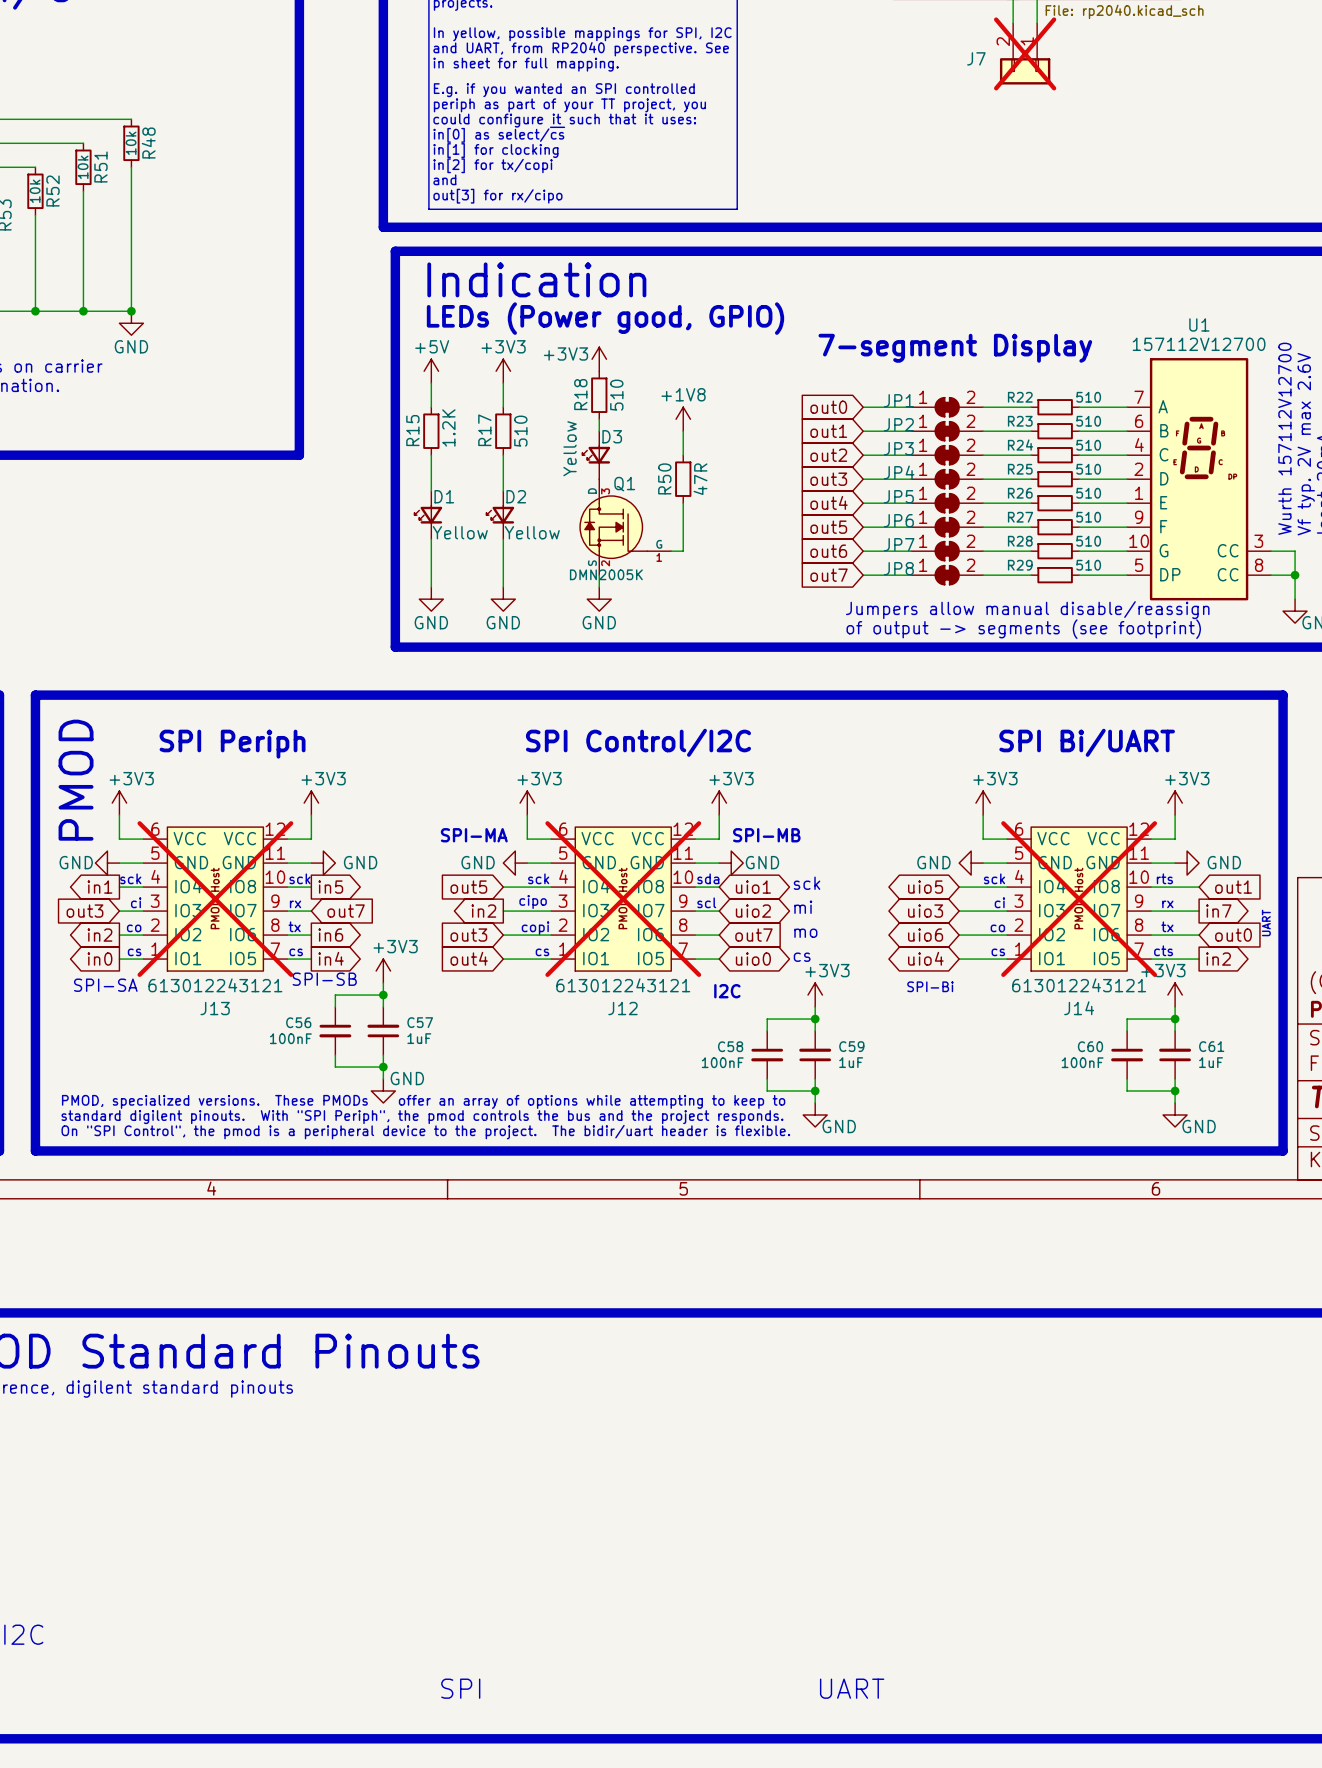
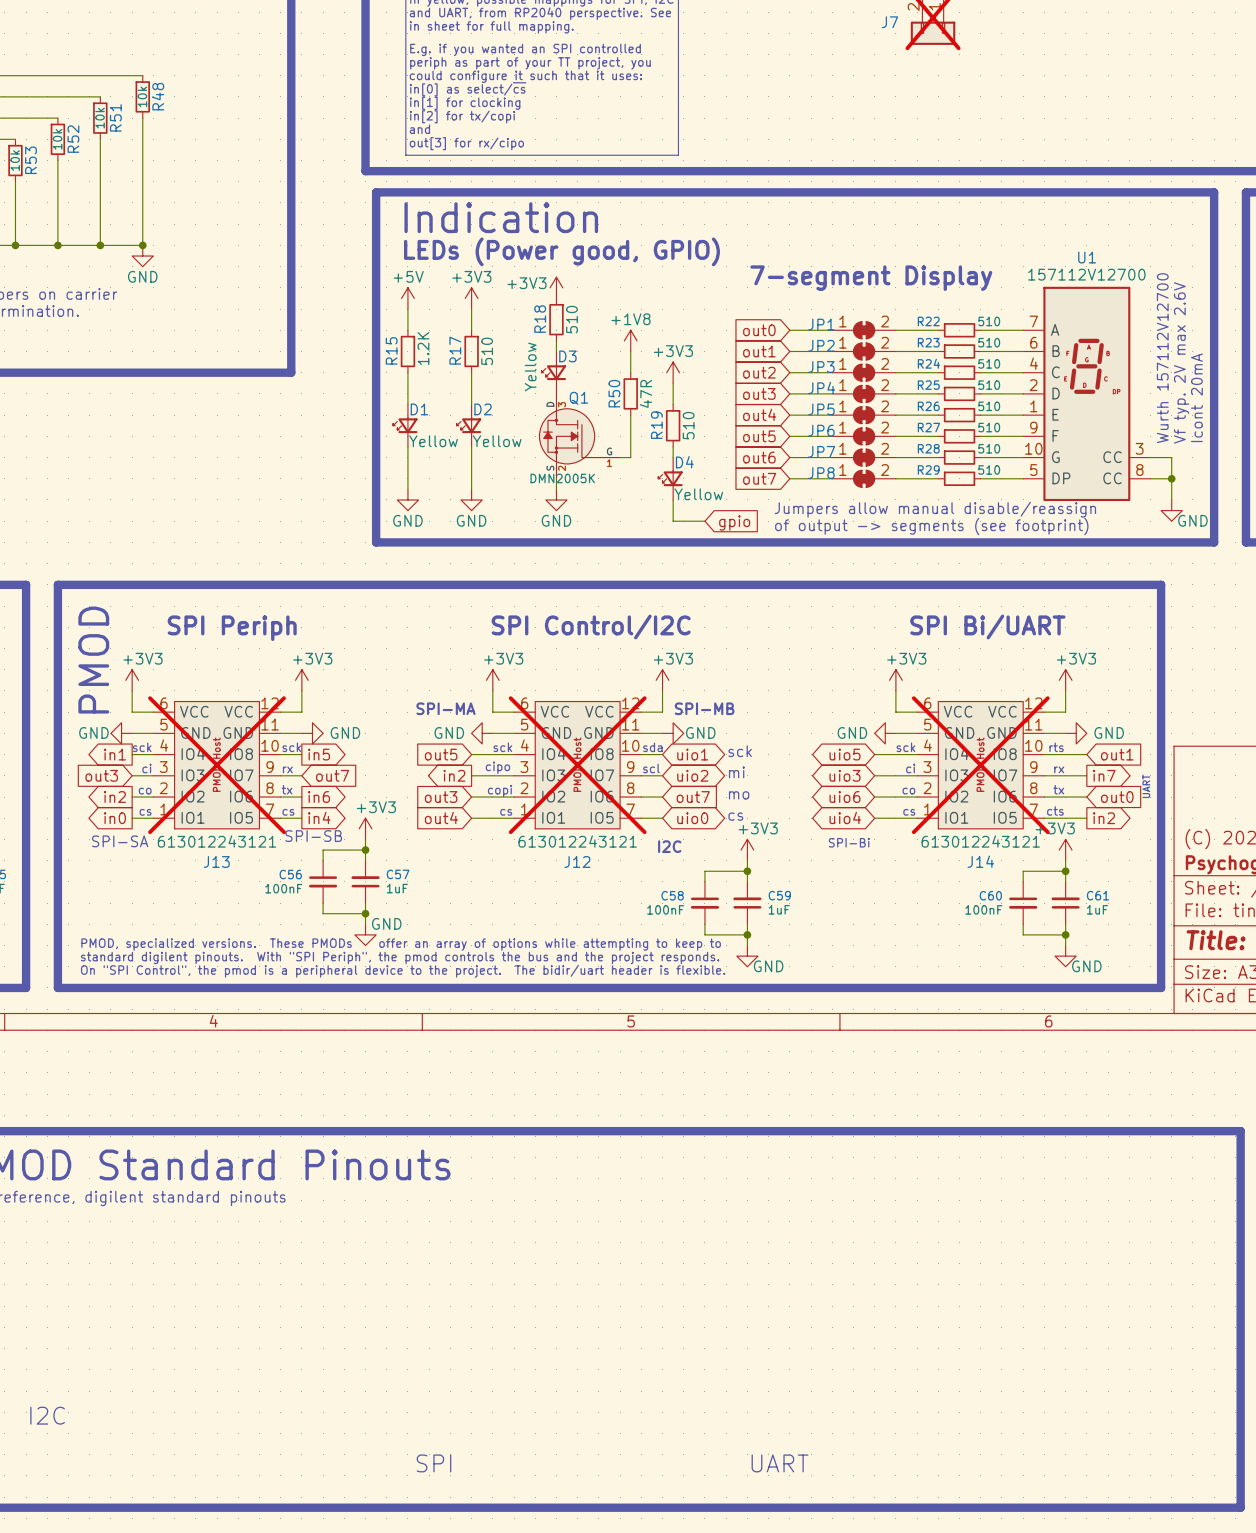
power symbol: none -> +3V3 (673, 372)
wire: none -> (673, 383) (673, 404)
R19: none -> 510 (673, 425)
wire: none -> (673, 446) (673, 457)
D4: none -> Yellow (670, 478)
wire: none -> (673, 499) (673, 521) (704, 521)
global label: none -> gpio (734, 522)

